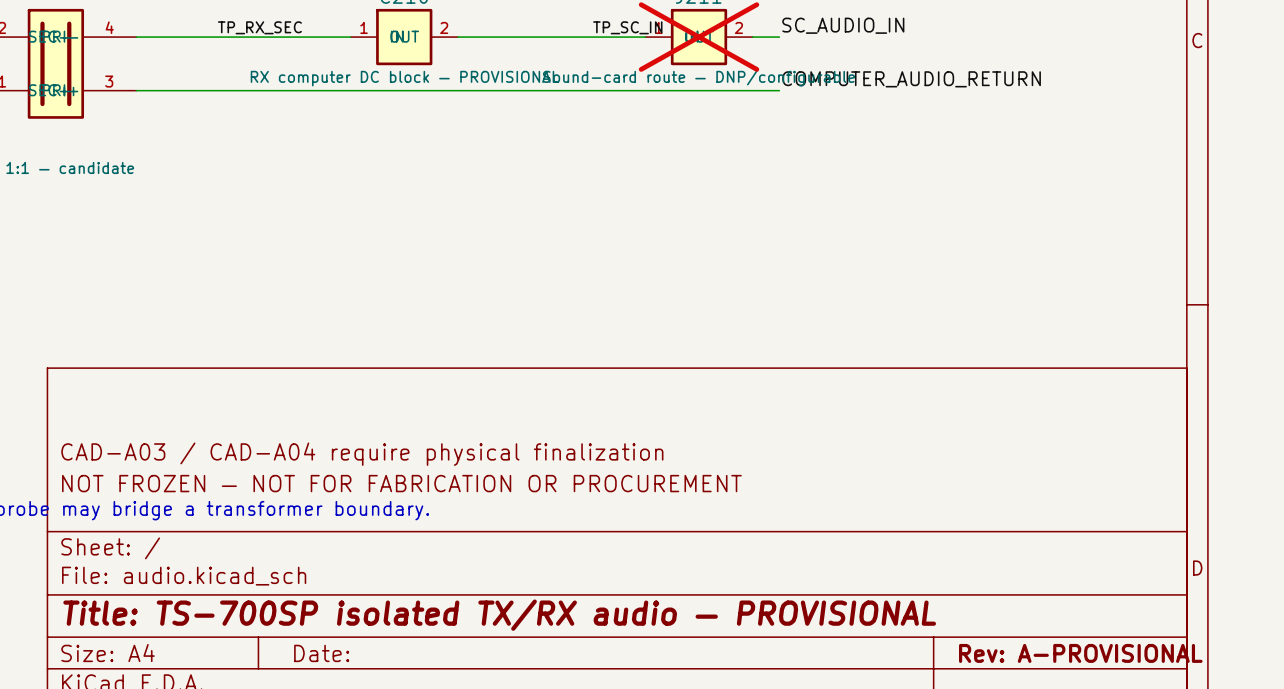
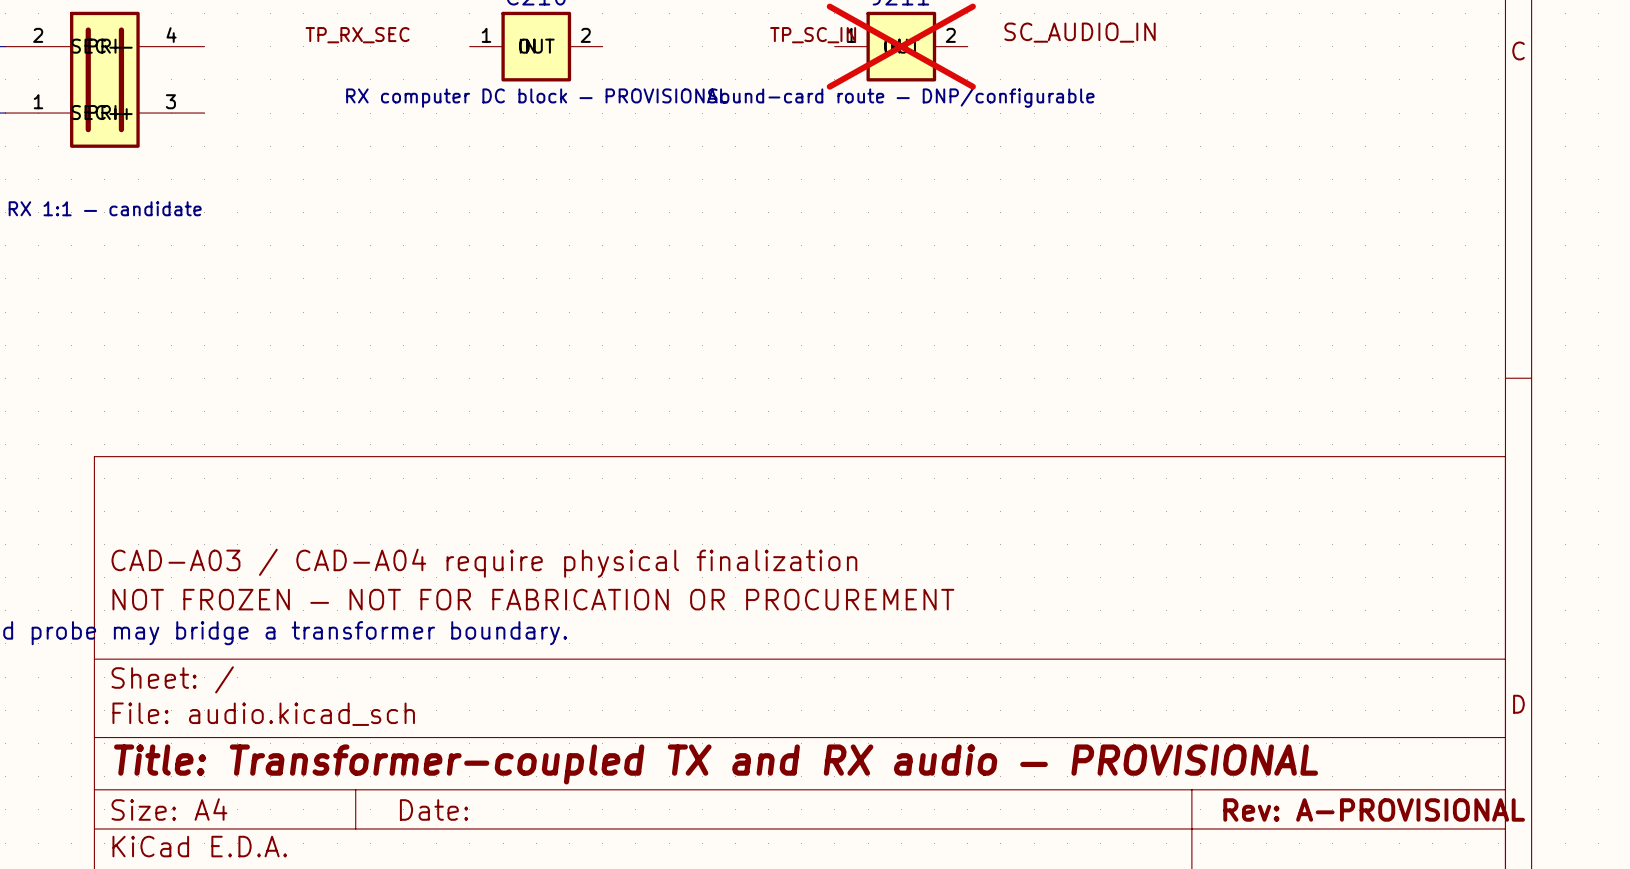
wire: (136, 37) (350, 37) -> none
wire: (457, 37) (645, 37) -> none
wire: (752, 37) (779, 37) -> none
label: COMPUTER_AUDIO_RETURN (911, 79) -> none
wire: (136, 90) (779, 90) -> none
title block: Title: TS-700SP isolated TX/RX audio — PROVISIONAL (499, 615) -> Title: Transformer-coupled TX and RX audio — PROVISIONAL (716, 764)

